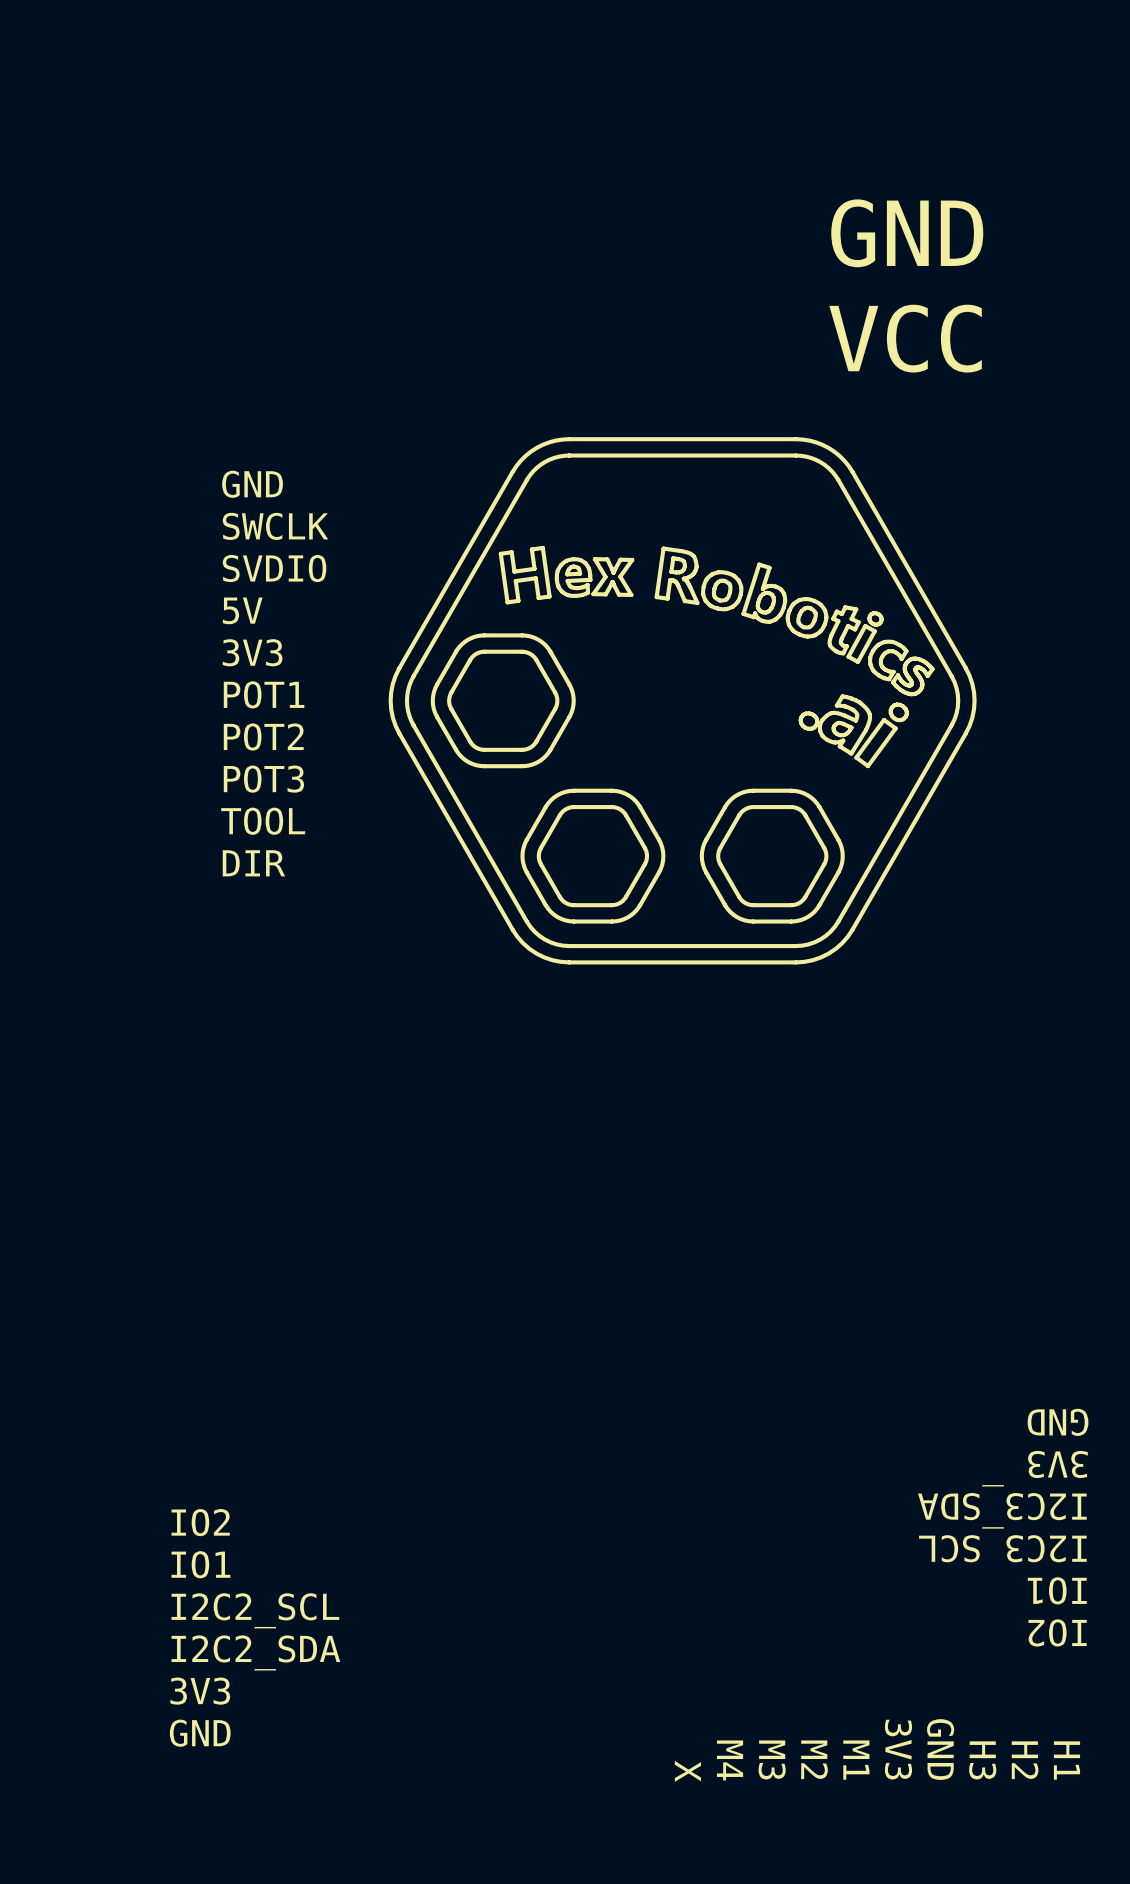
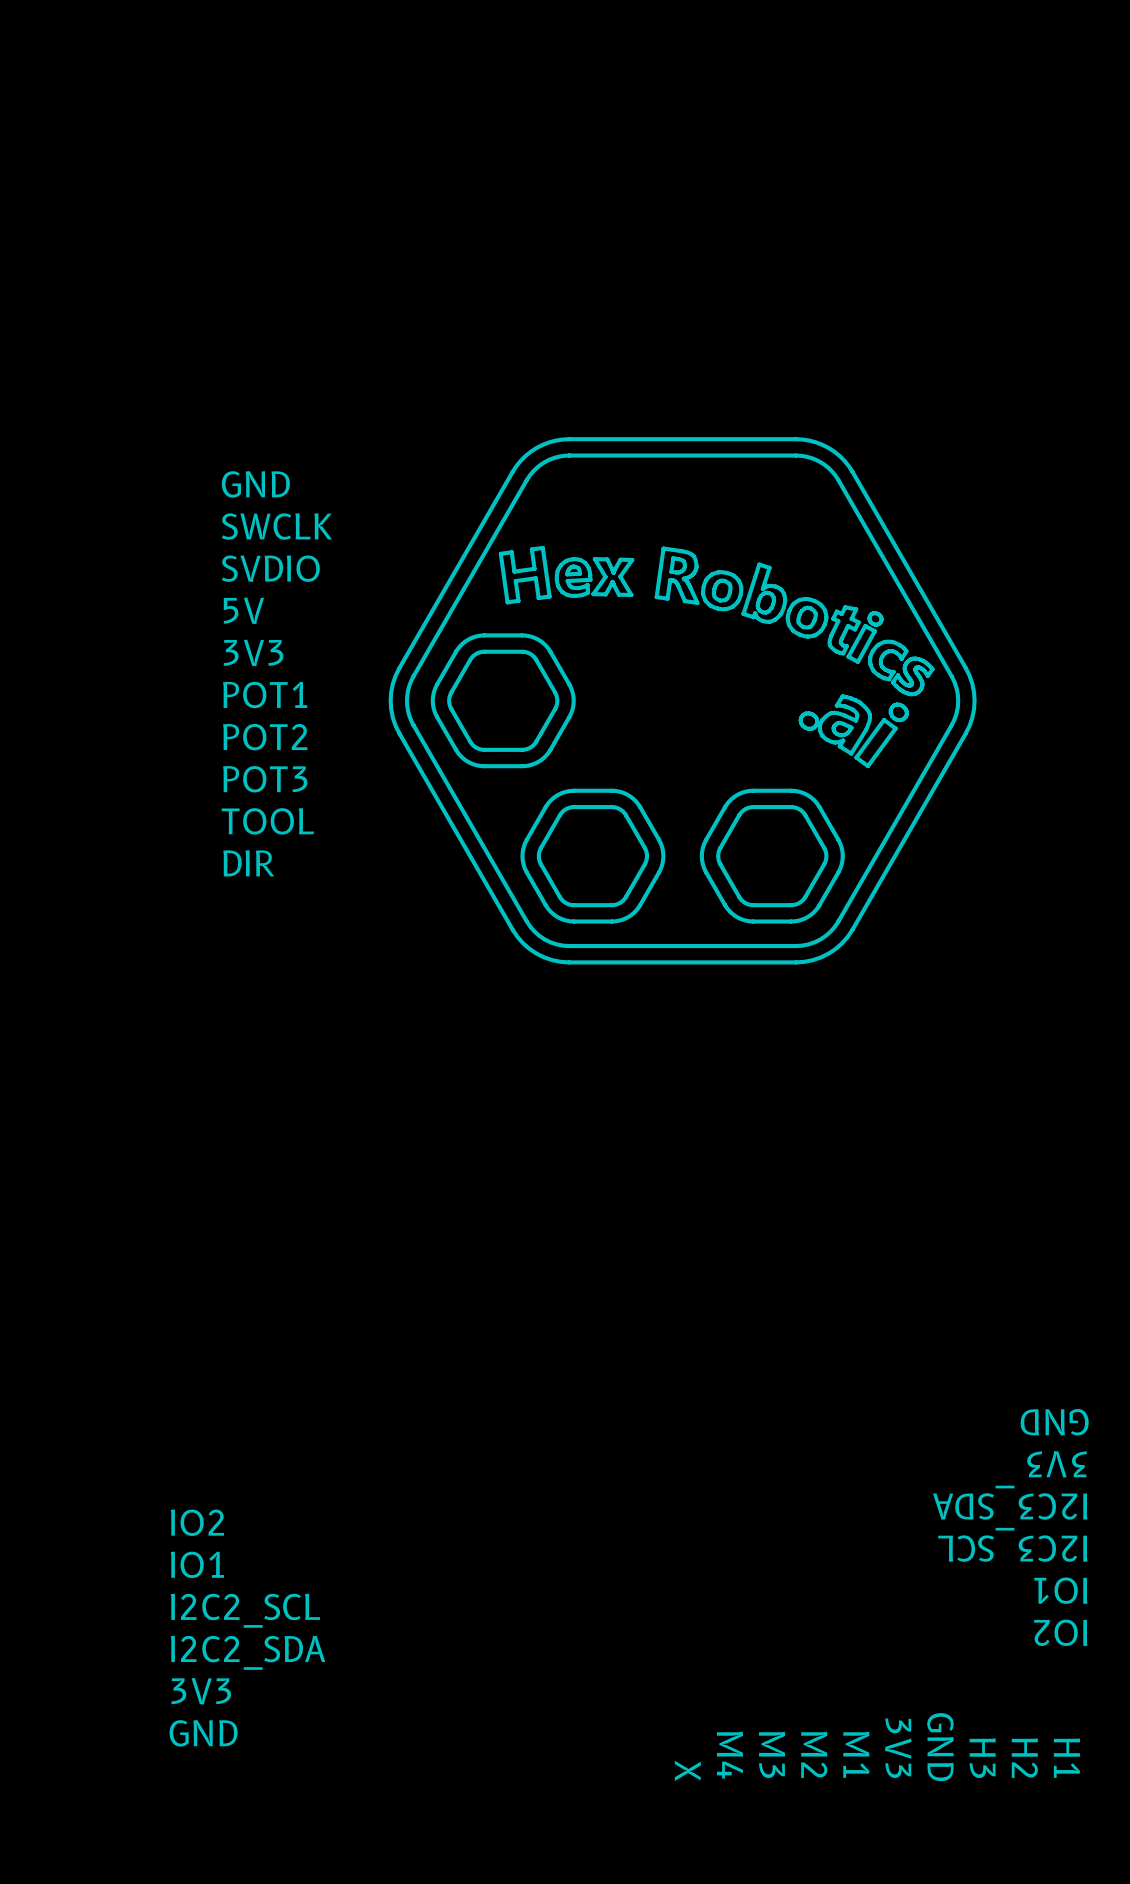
text: GND (907, 233) -> none
text: VCC (905, 338) -> none

